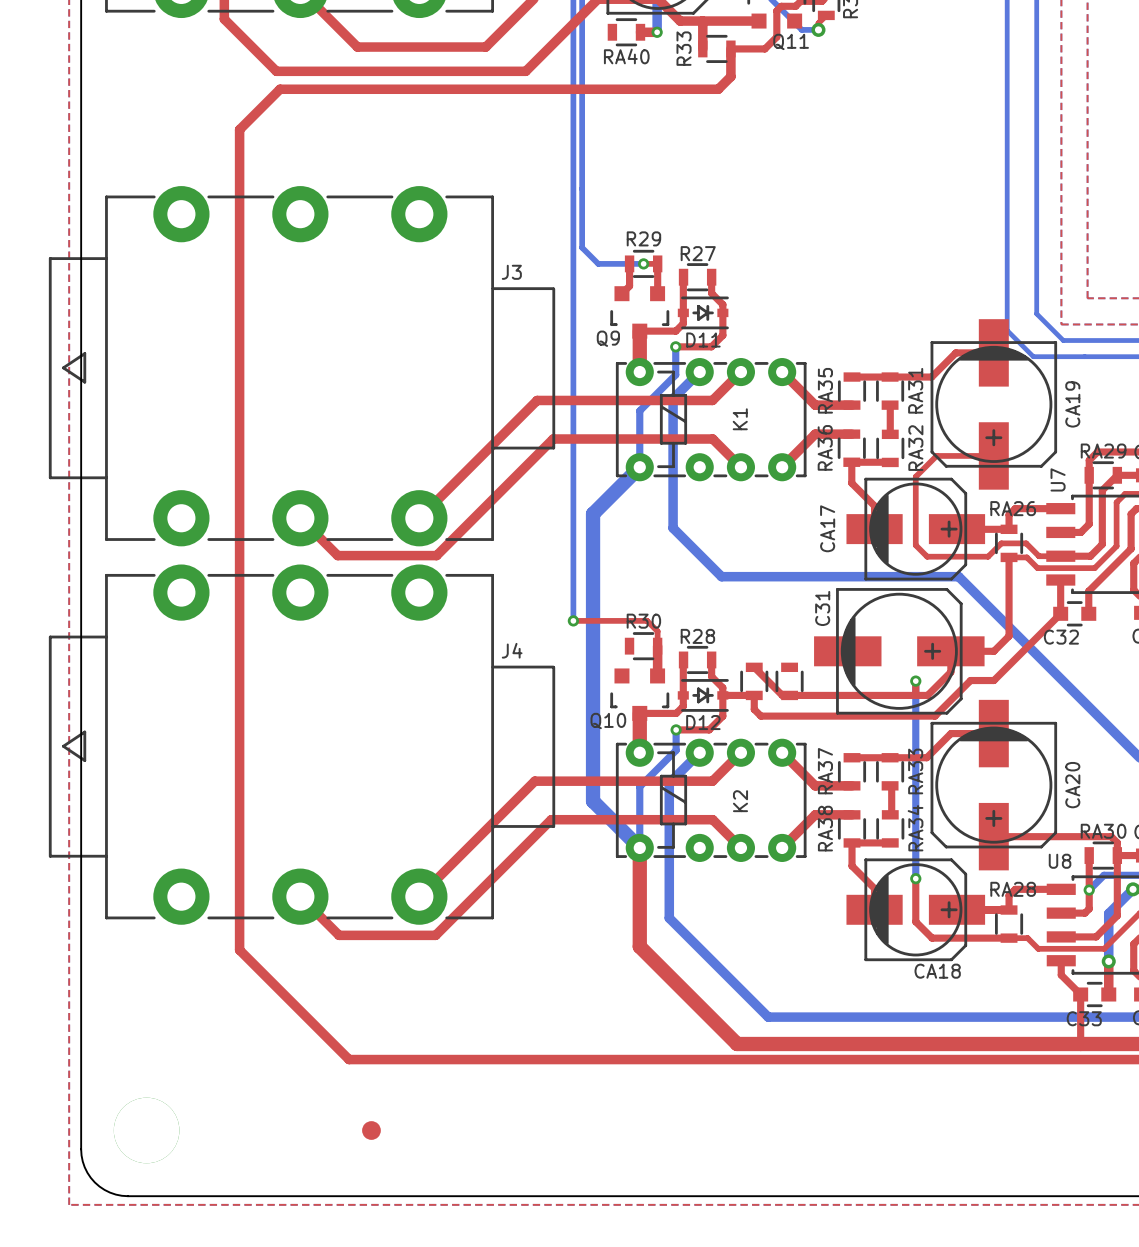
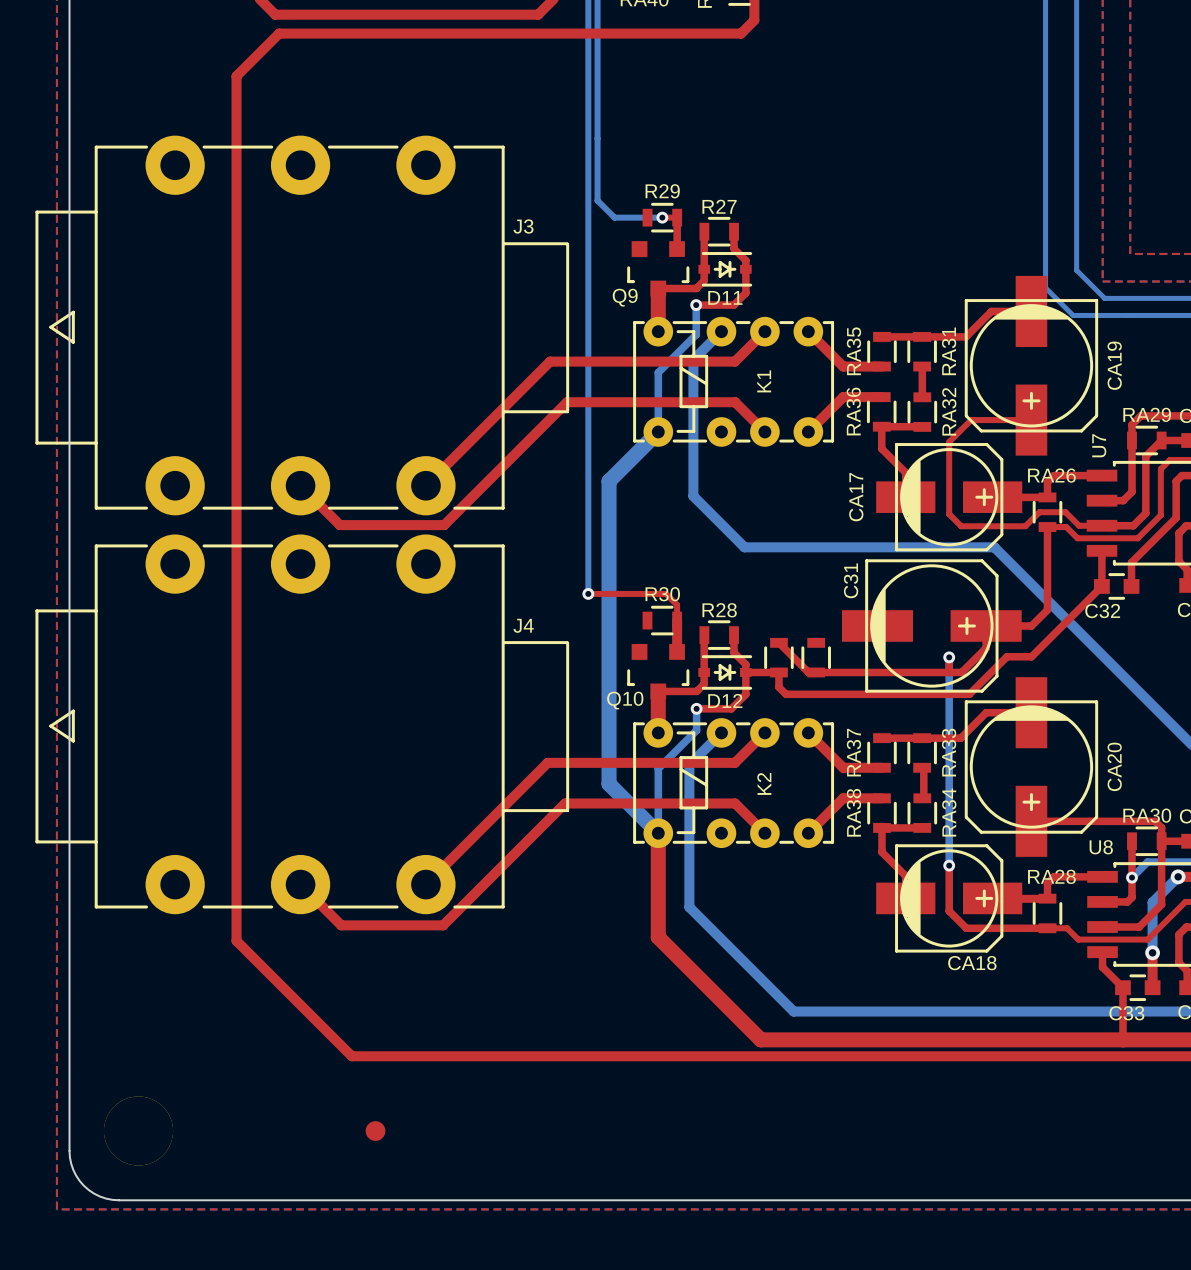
top track: (629, 263) (629, 286) (621, 293) -> none

